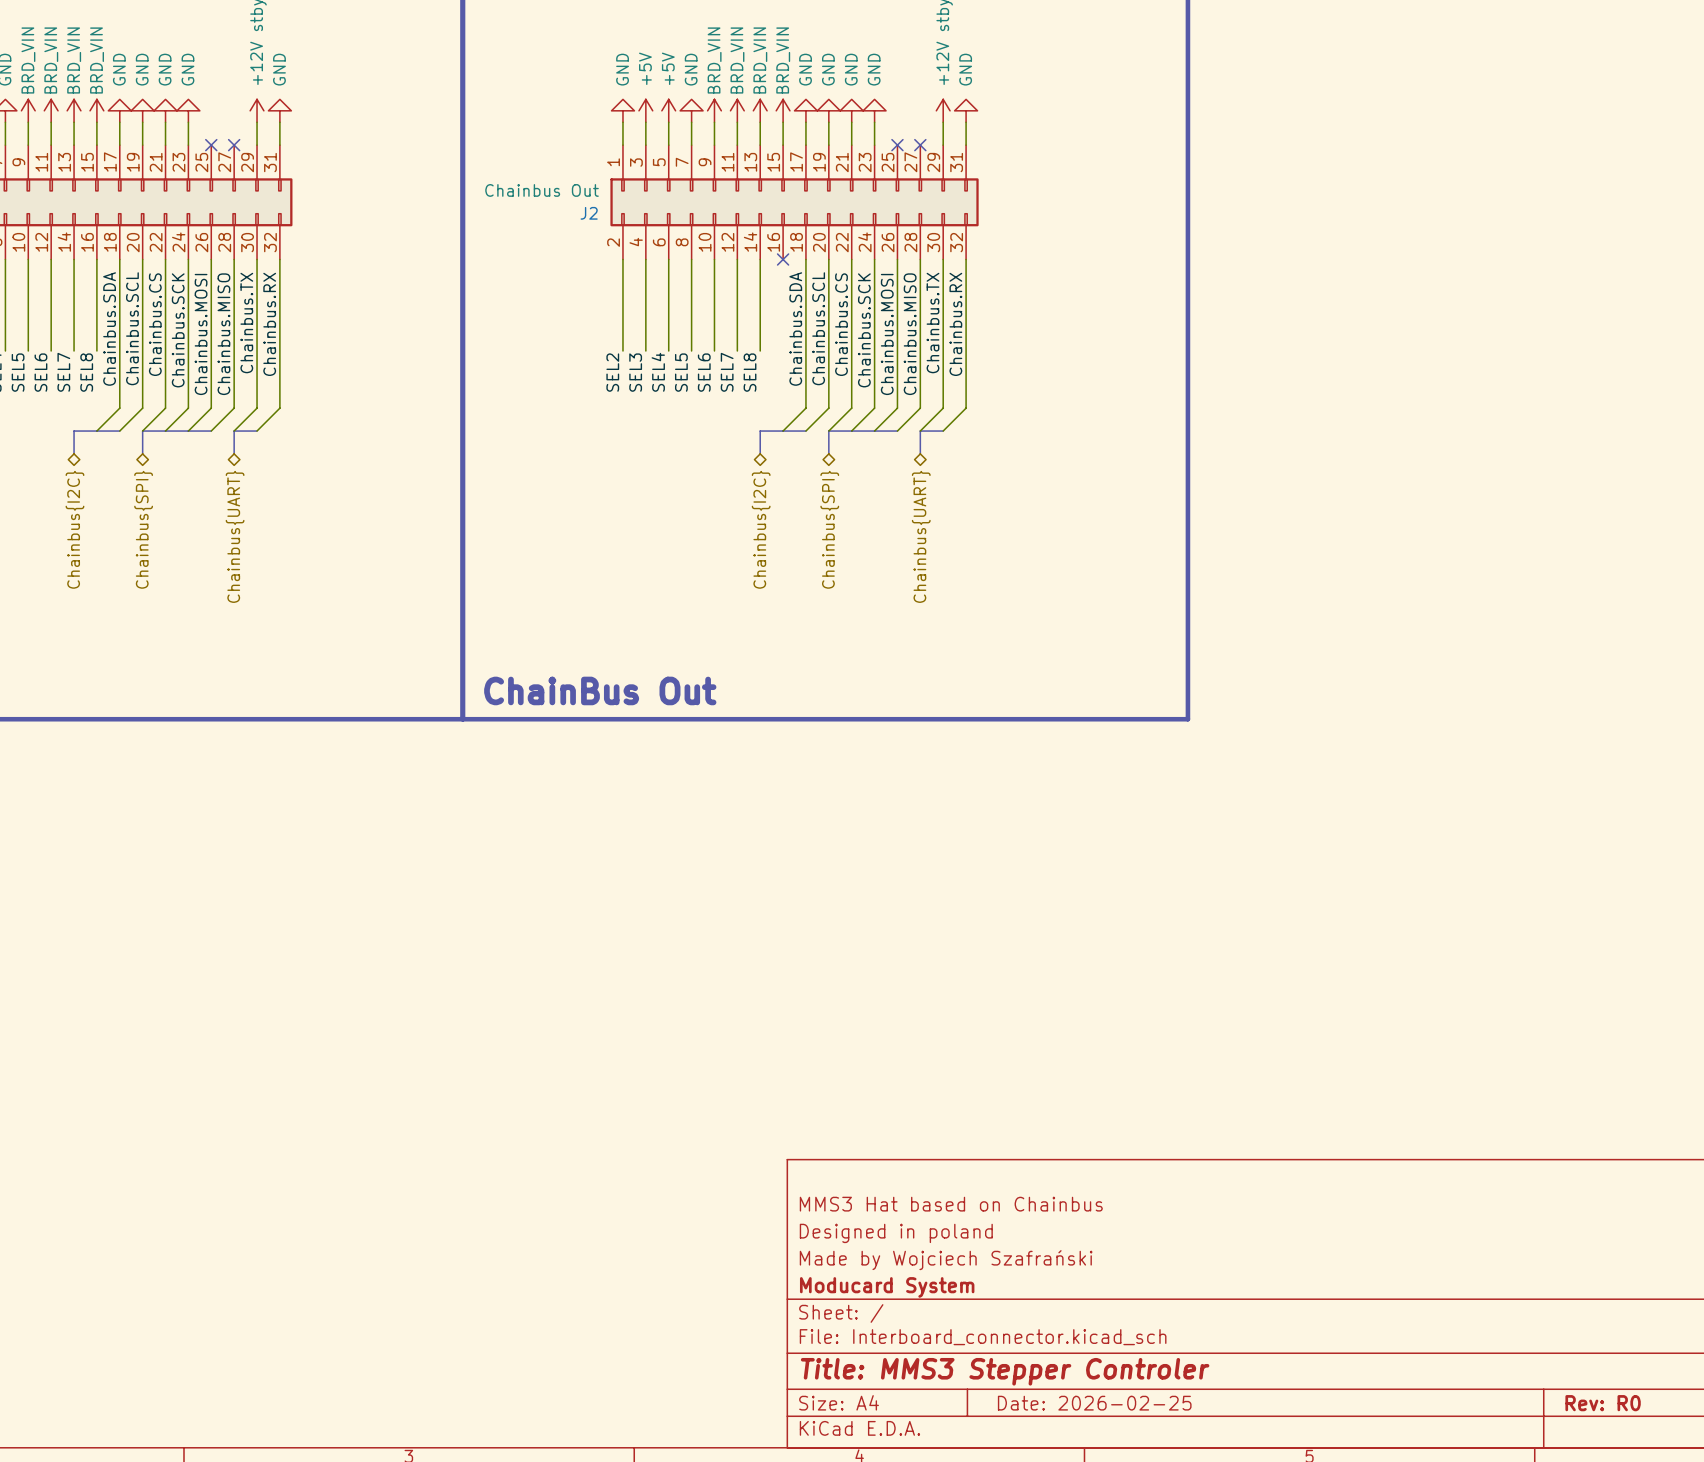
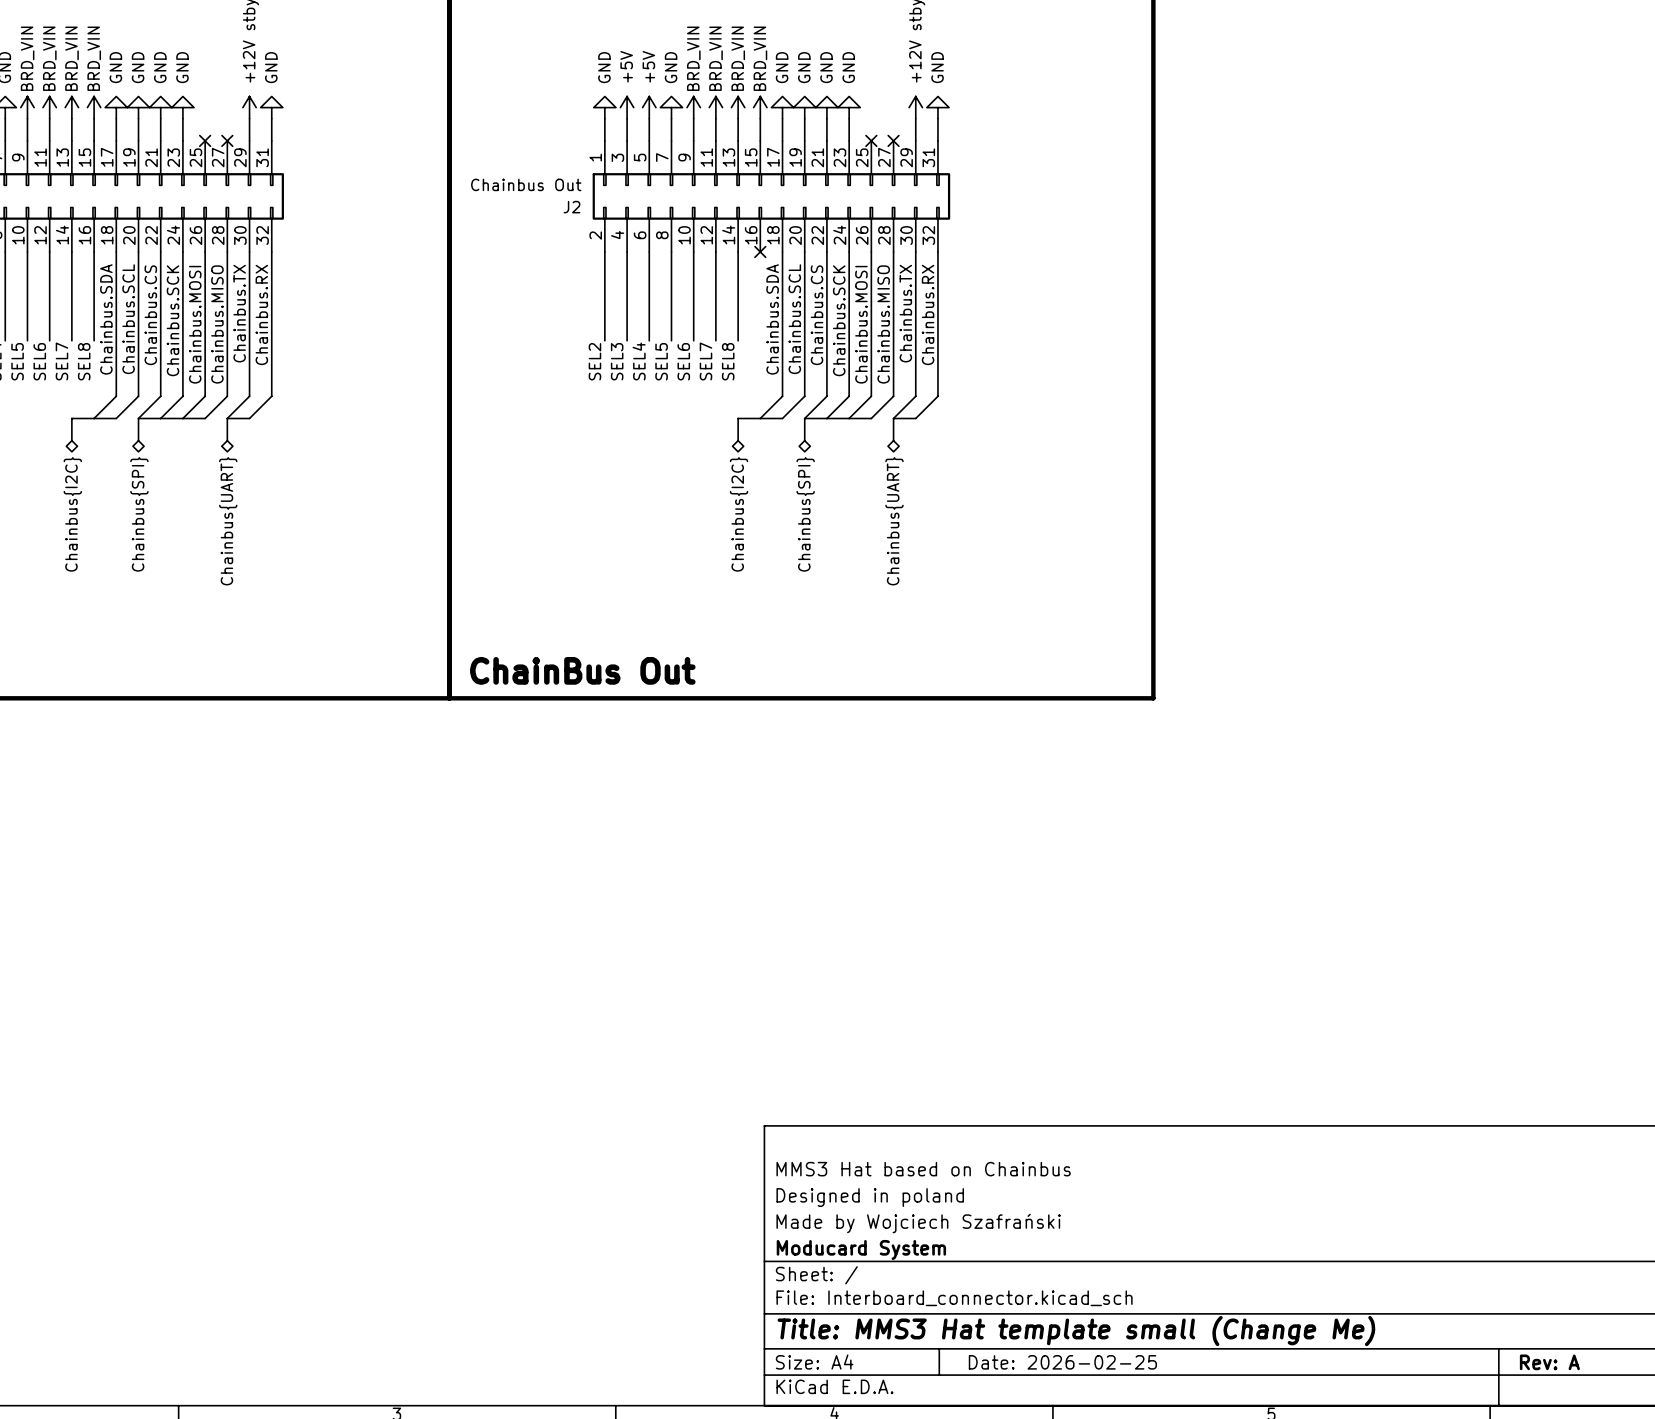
title block: Title: MMS3 Stepper Controler (1005, 1371) -> Title: MMS3 Hat template small (Change Me) (1076, 1331)
title block: Rev: R0 (1603, 1403) -> Rev: A (1549, 1362)

